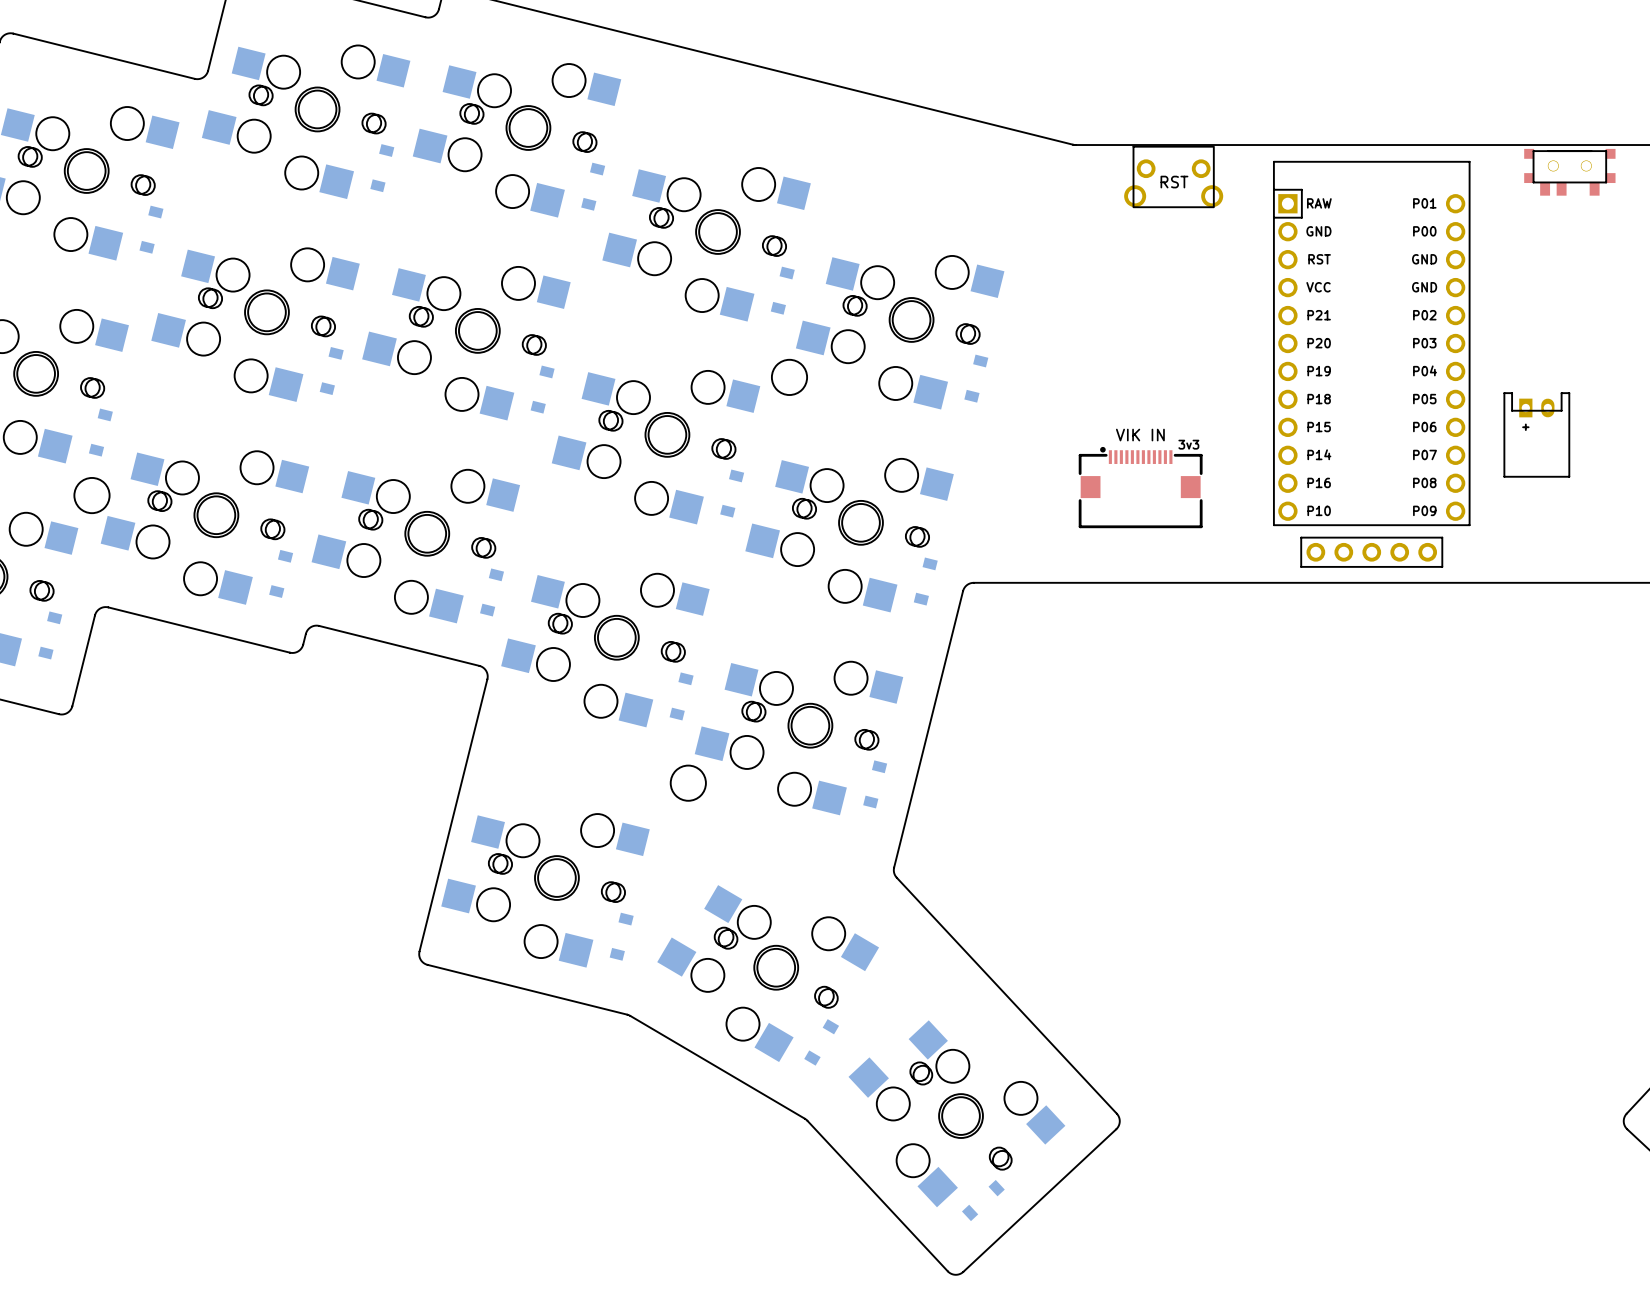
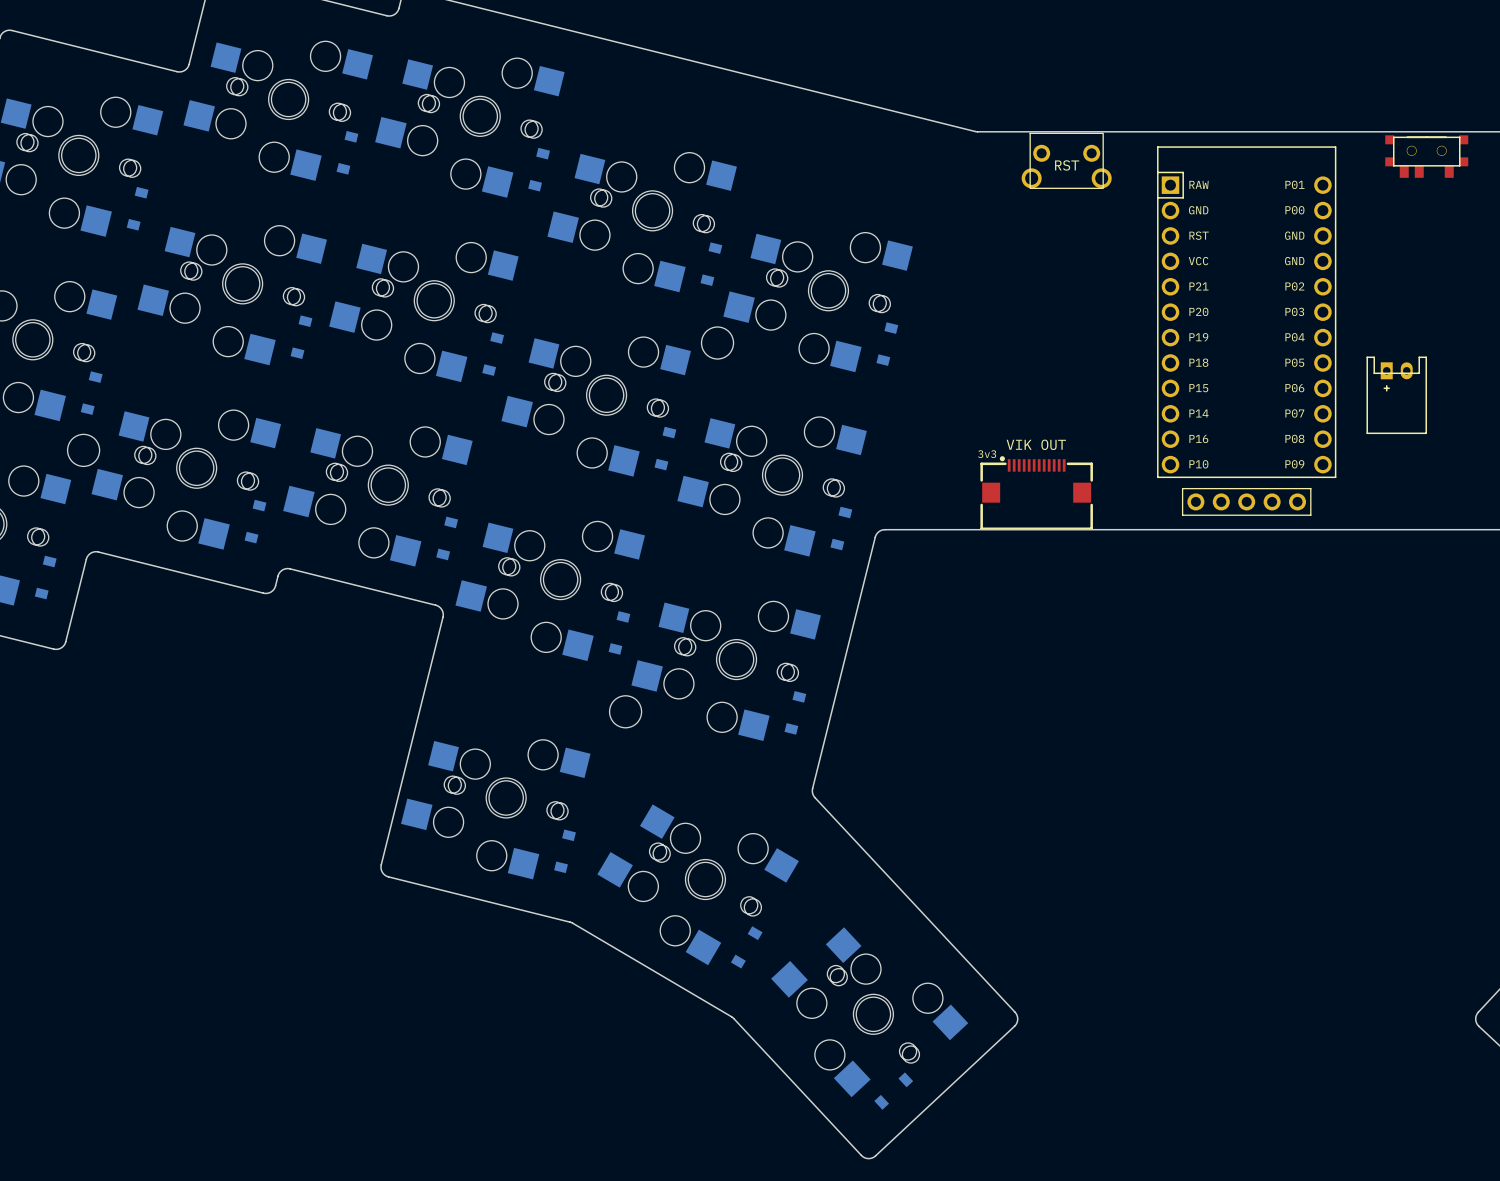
part: (1140, 487) -> none
part: none -> (1036, 493)

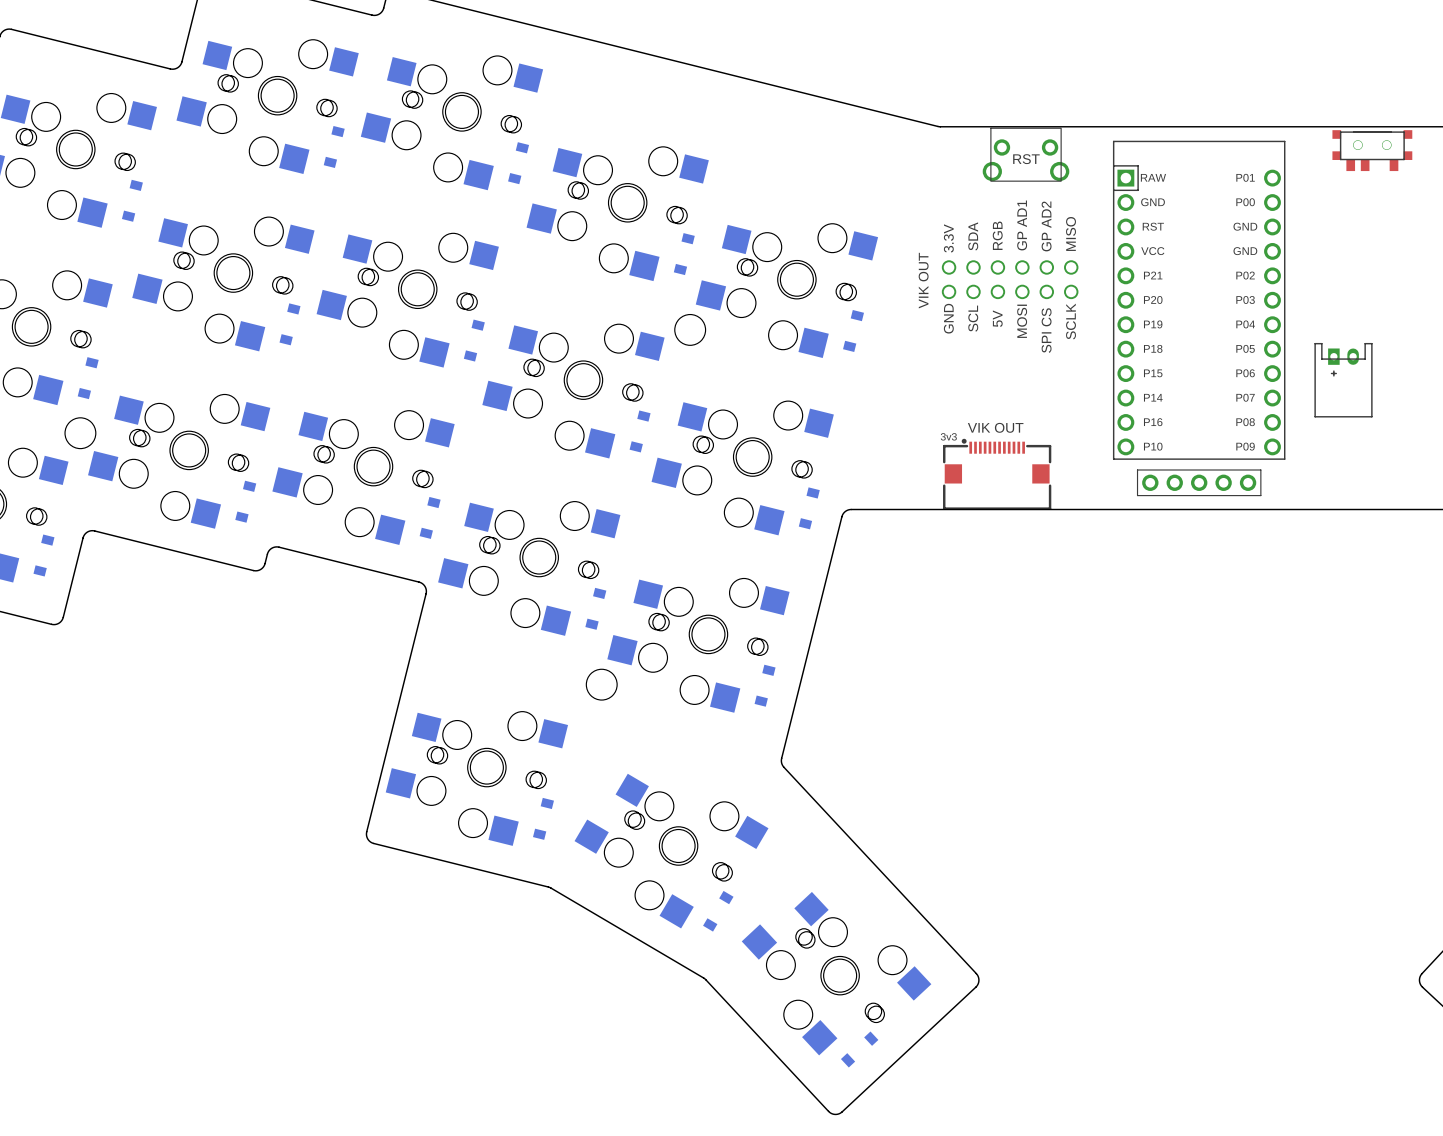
part: none -> (1010, 279)

